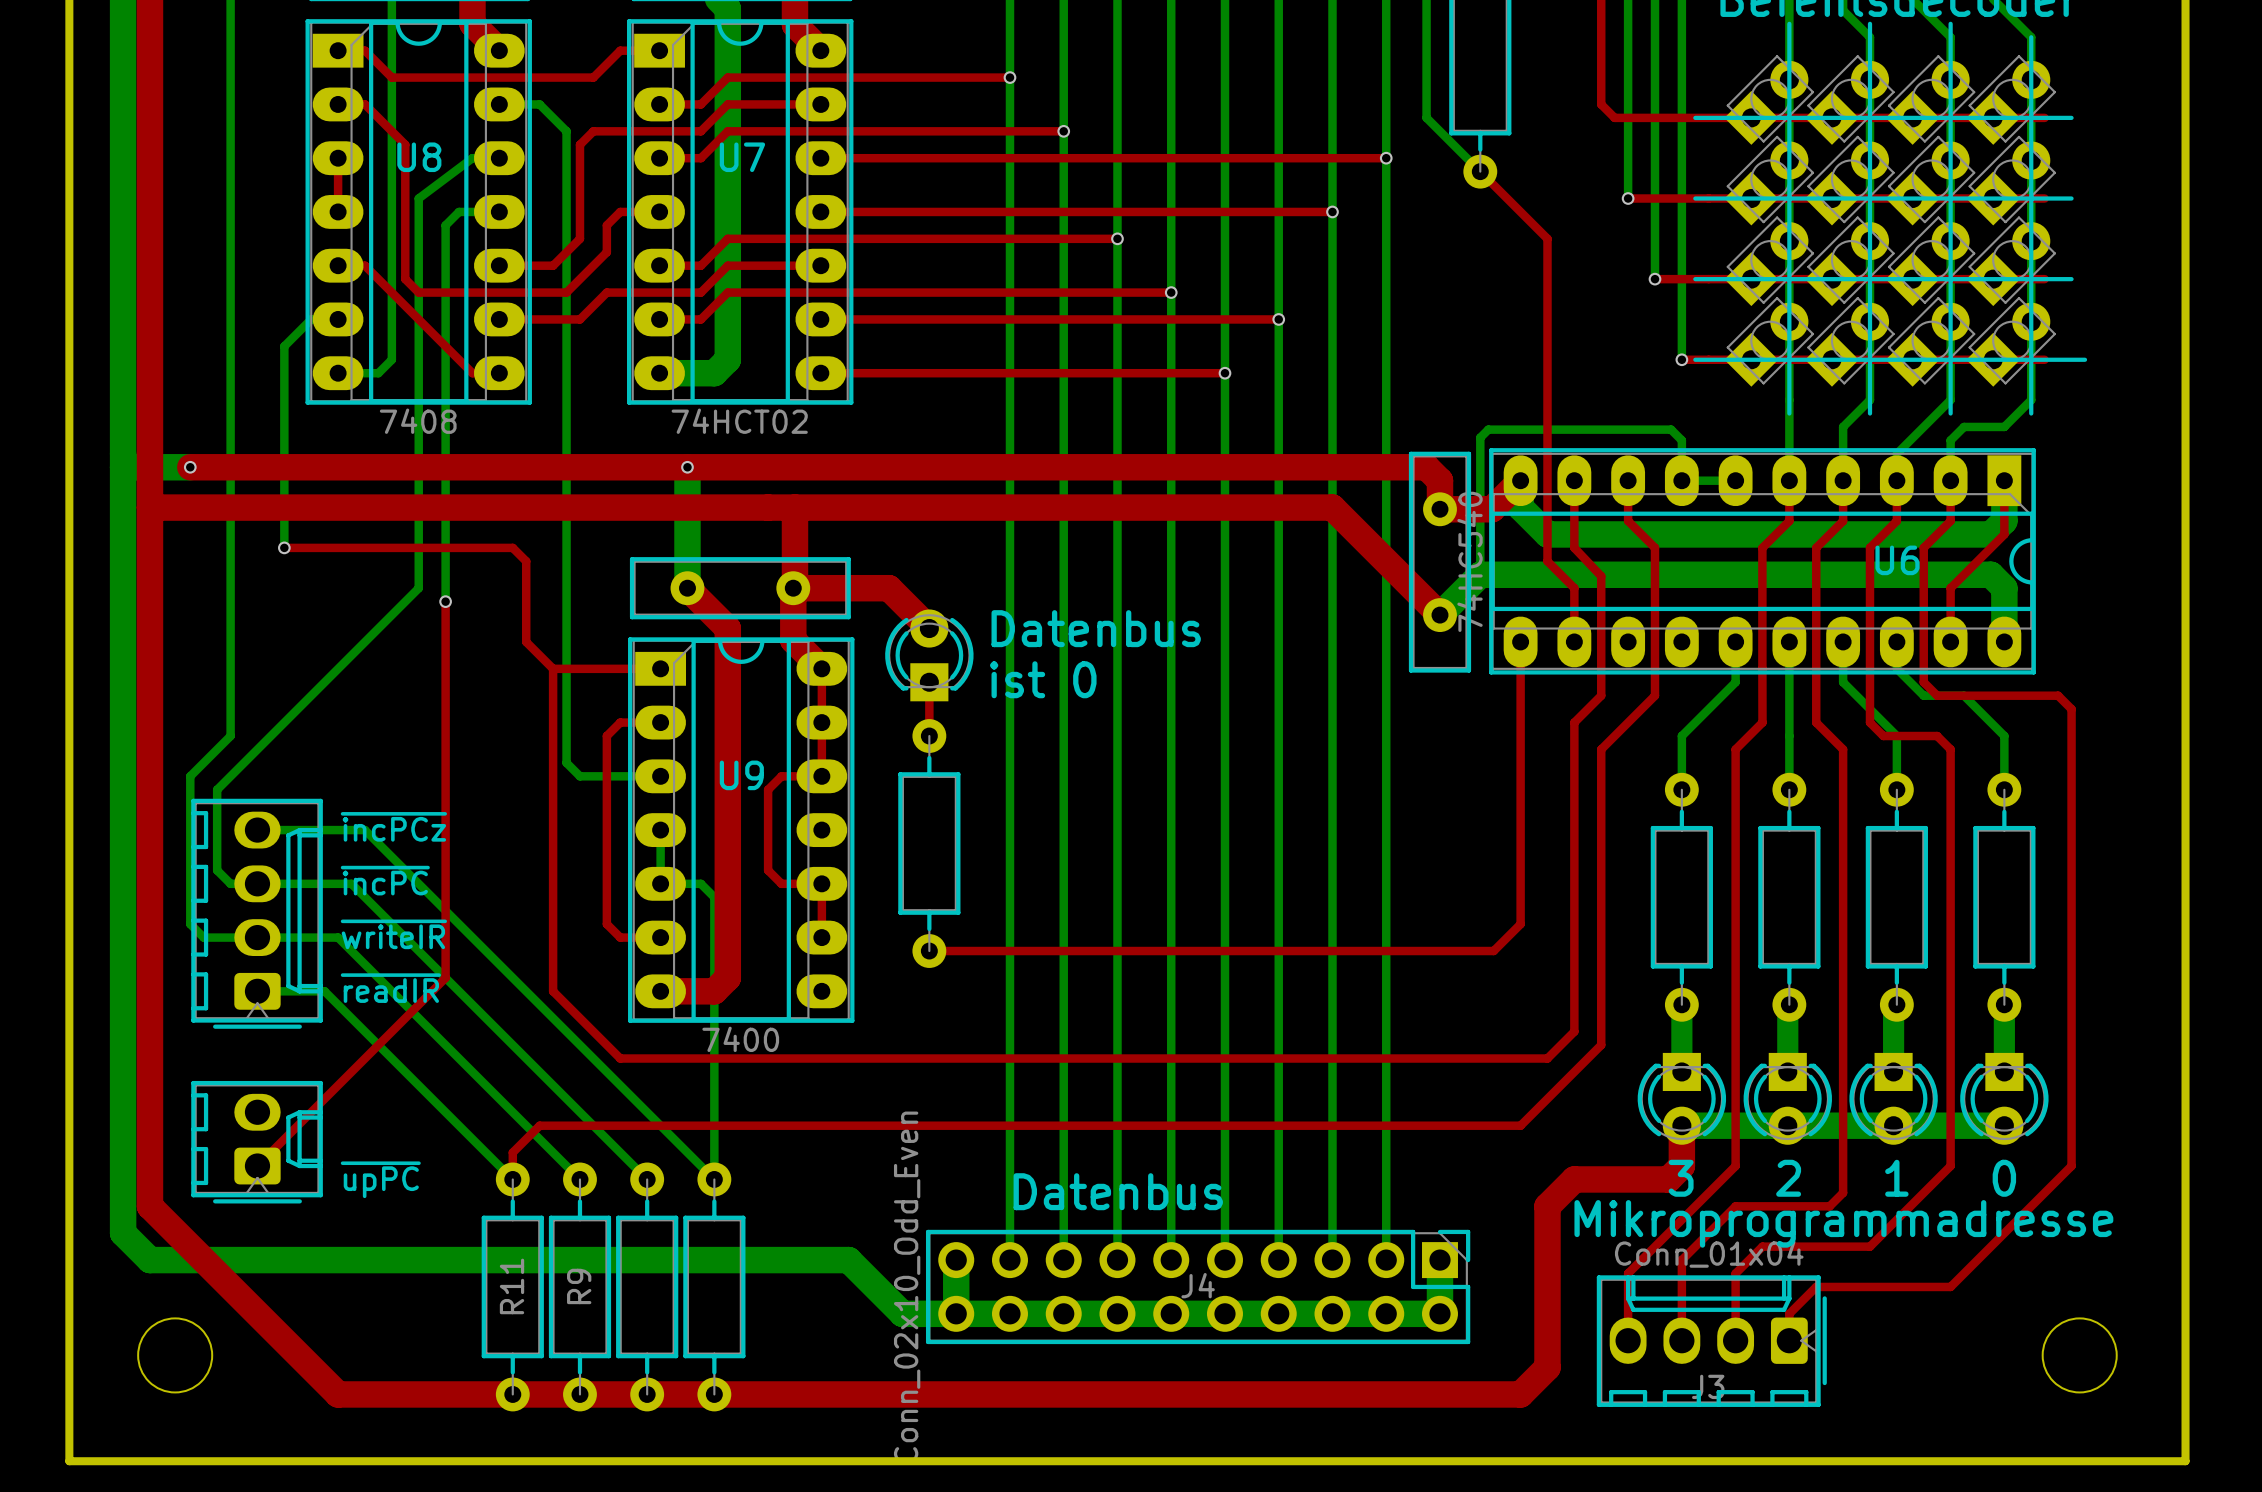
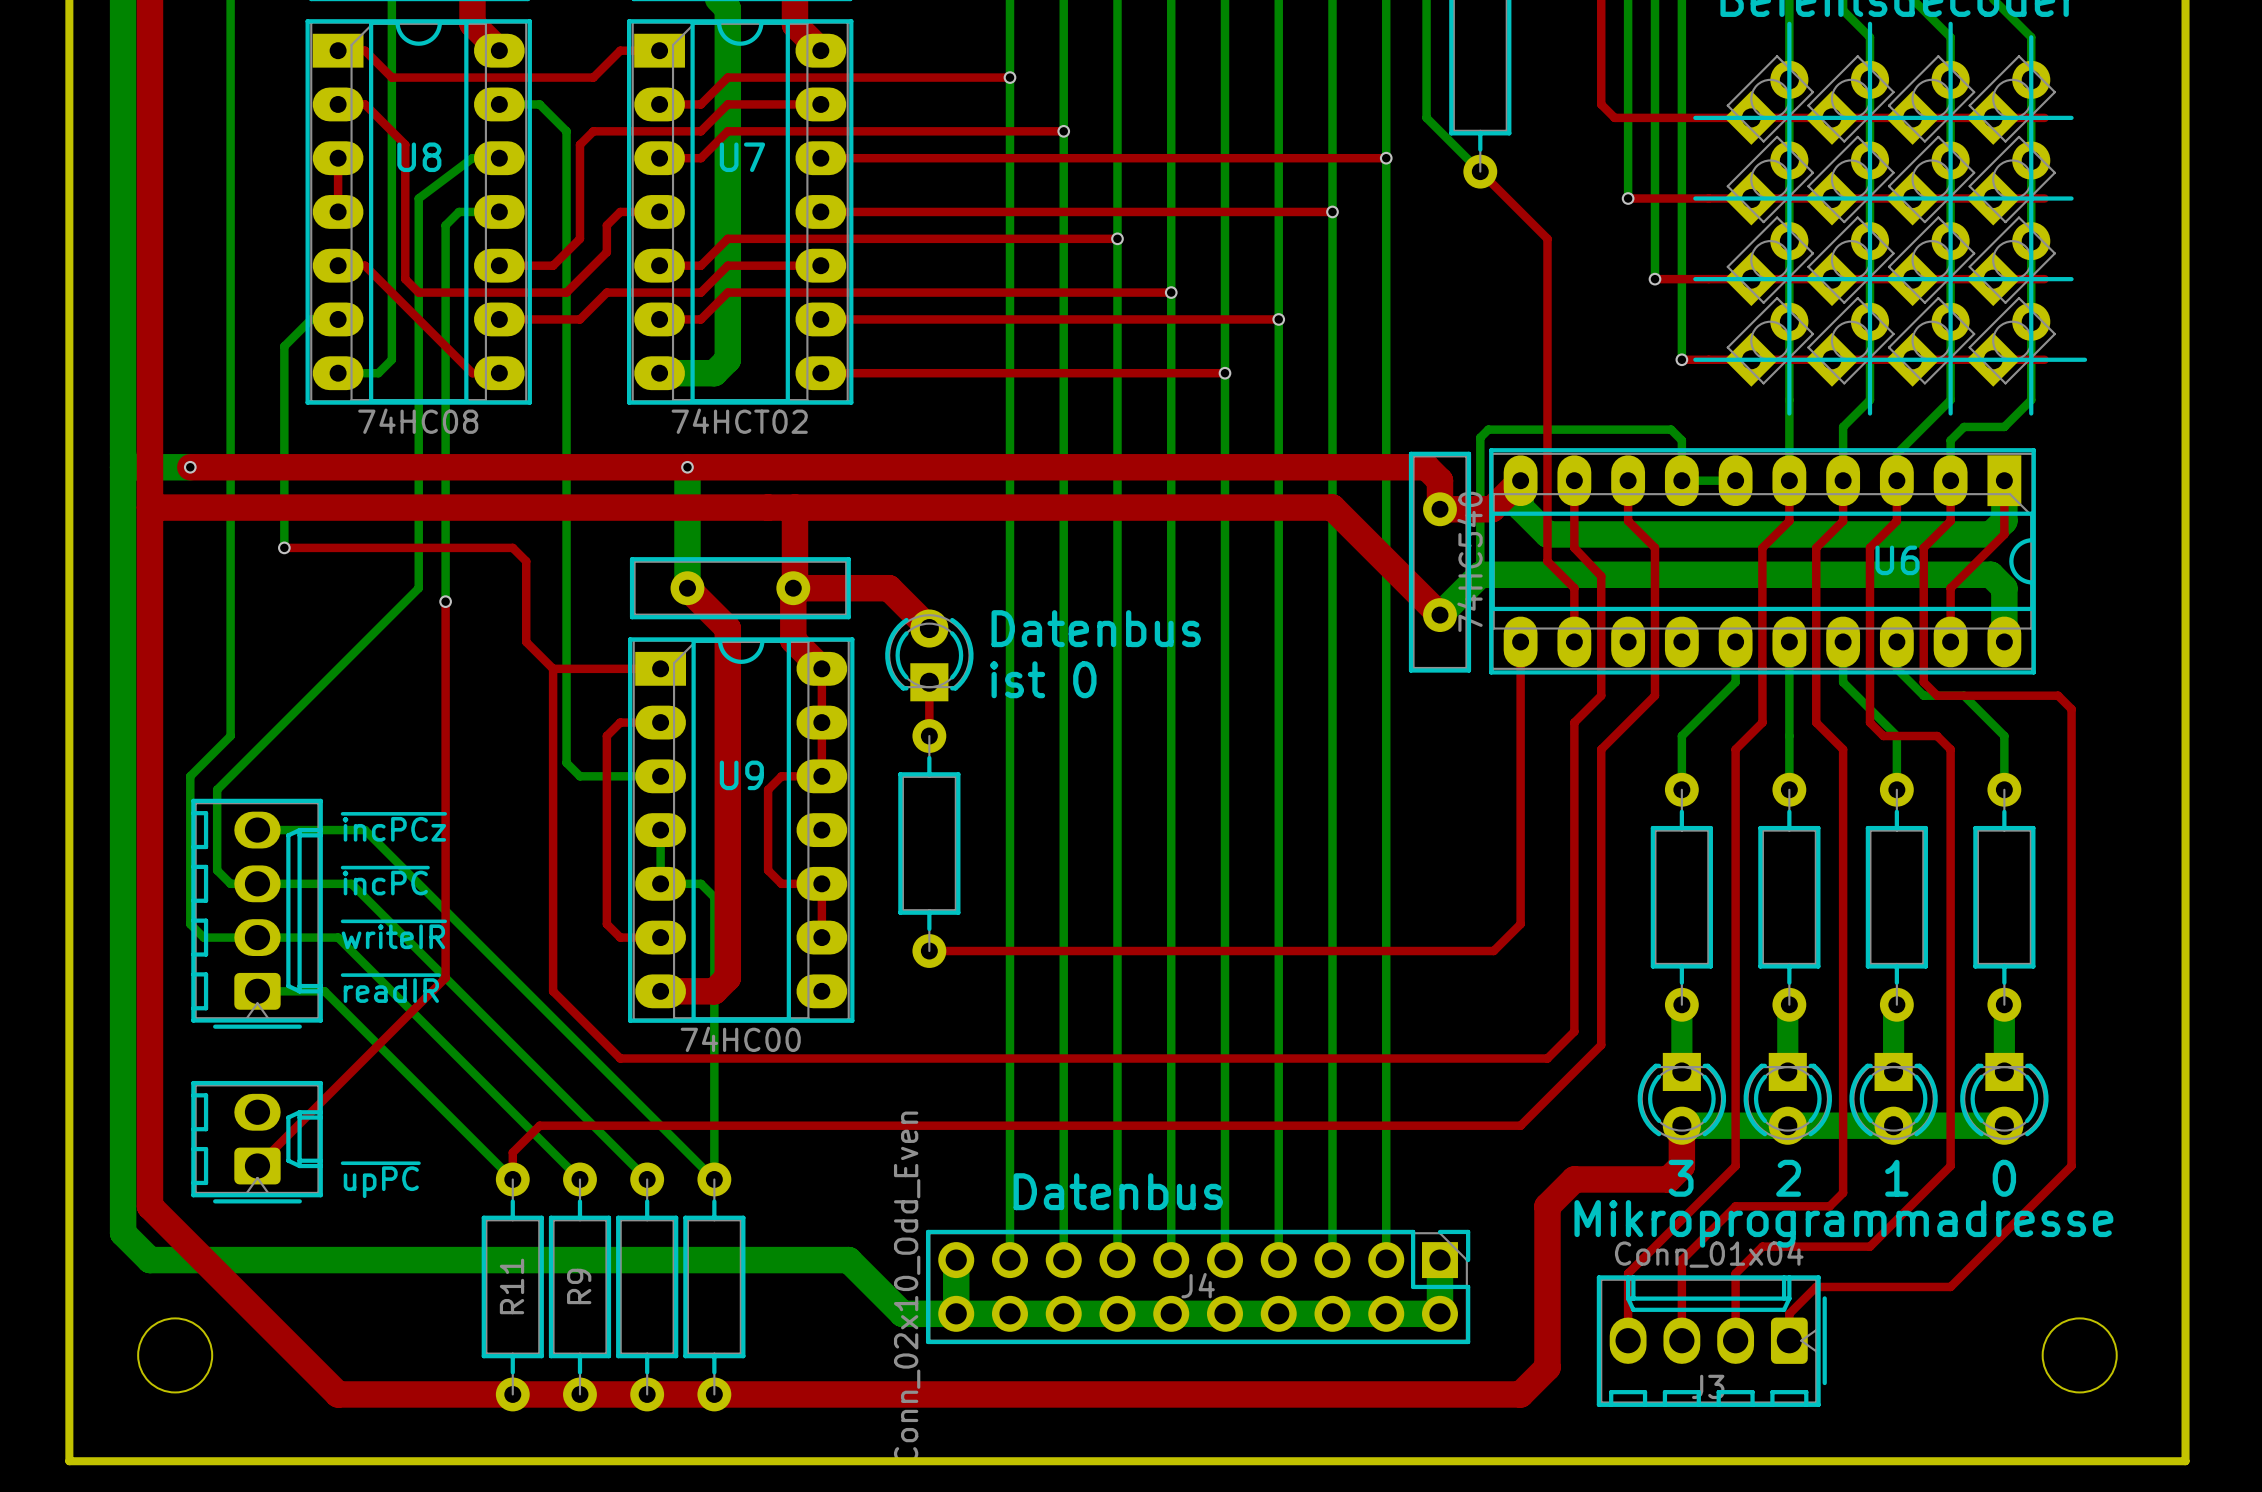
U8 value: 7408 (418, 421) -> 74HC08 (418, 421)
U9 value: 7400 (740, 1039) -> 74HC00 (740, 1039)

